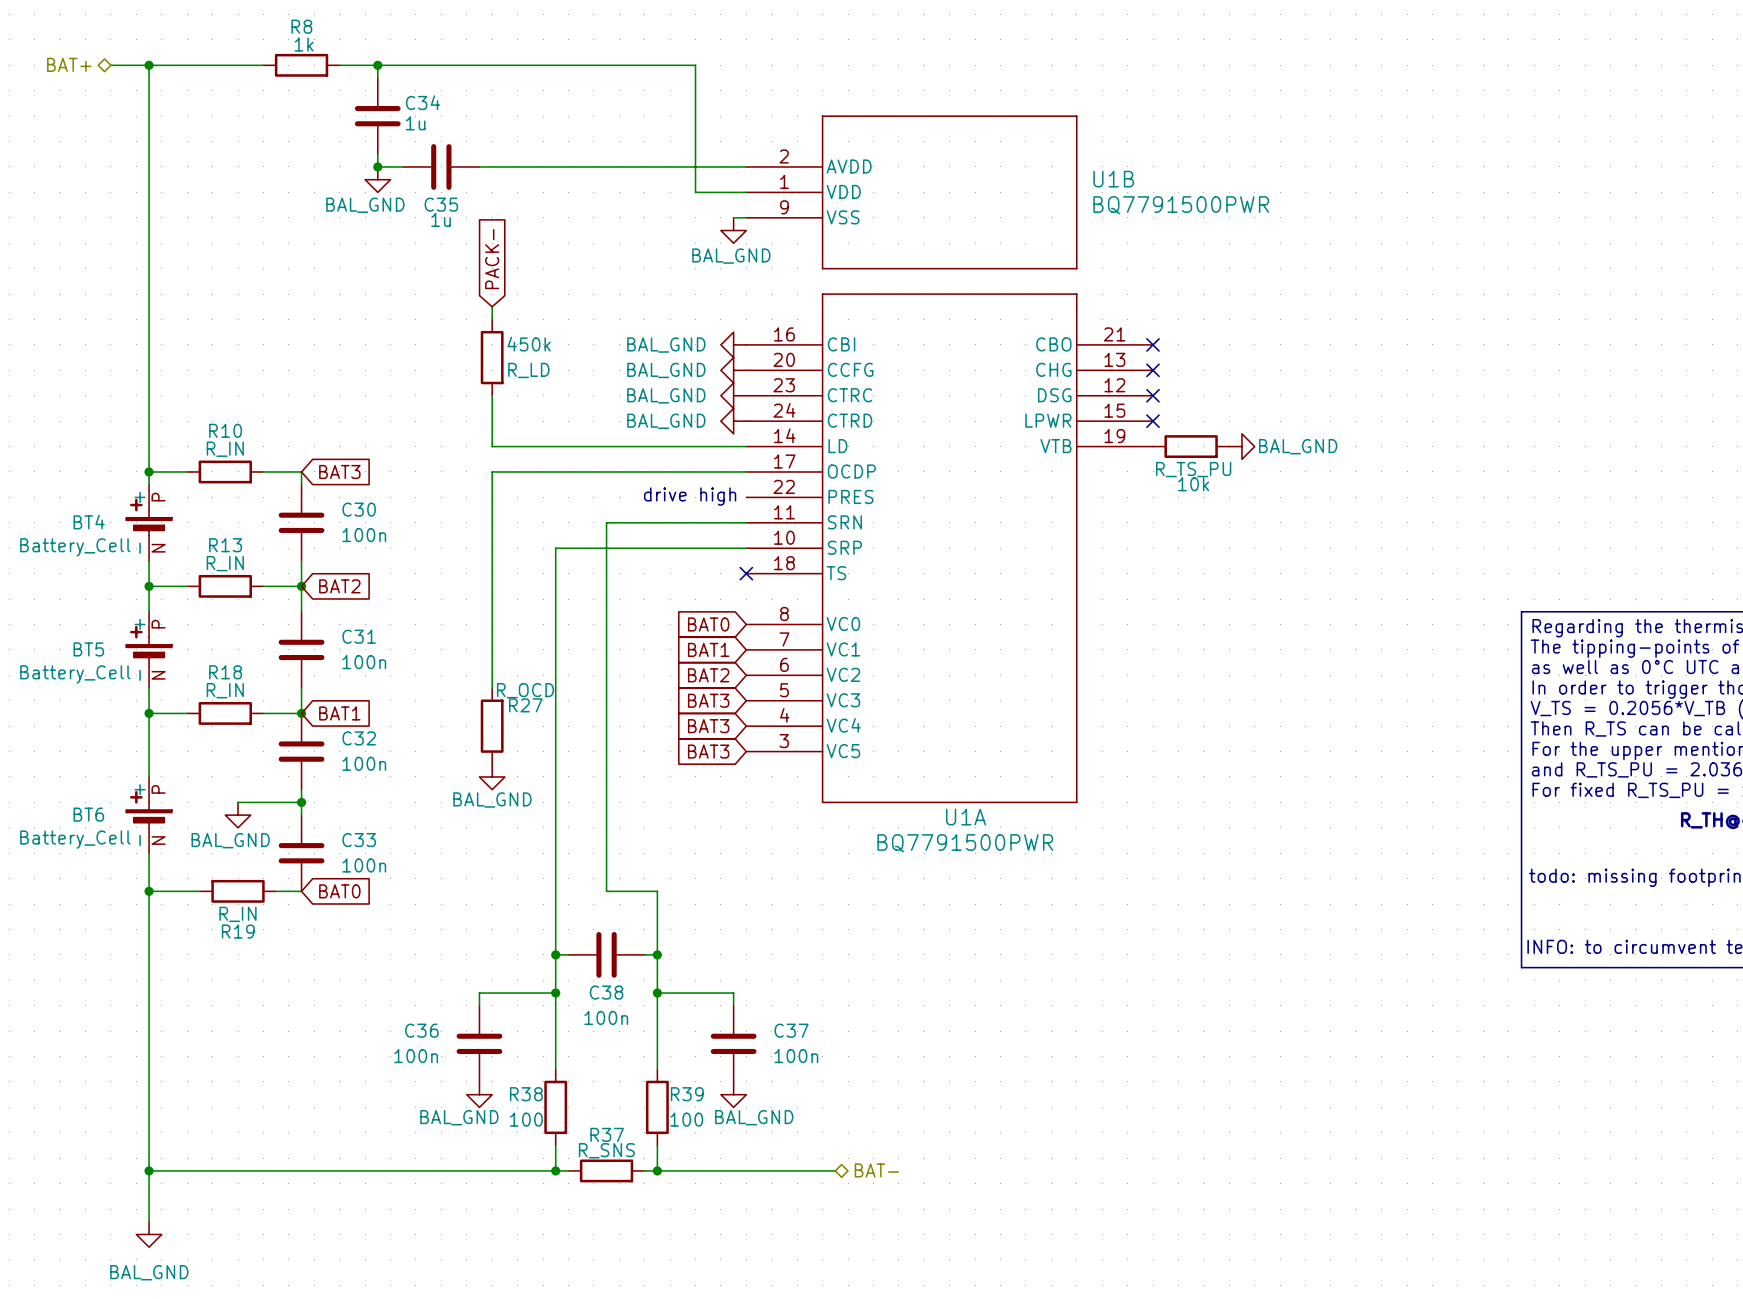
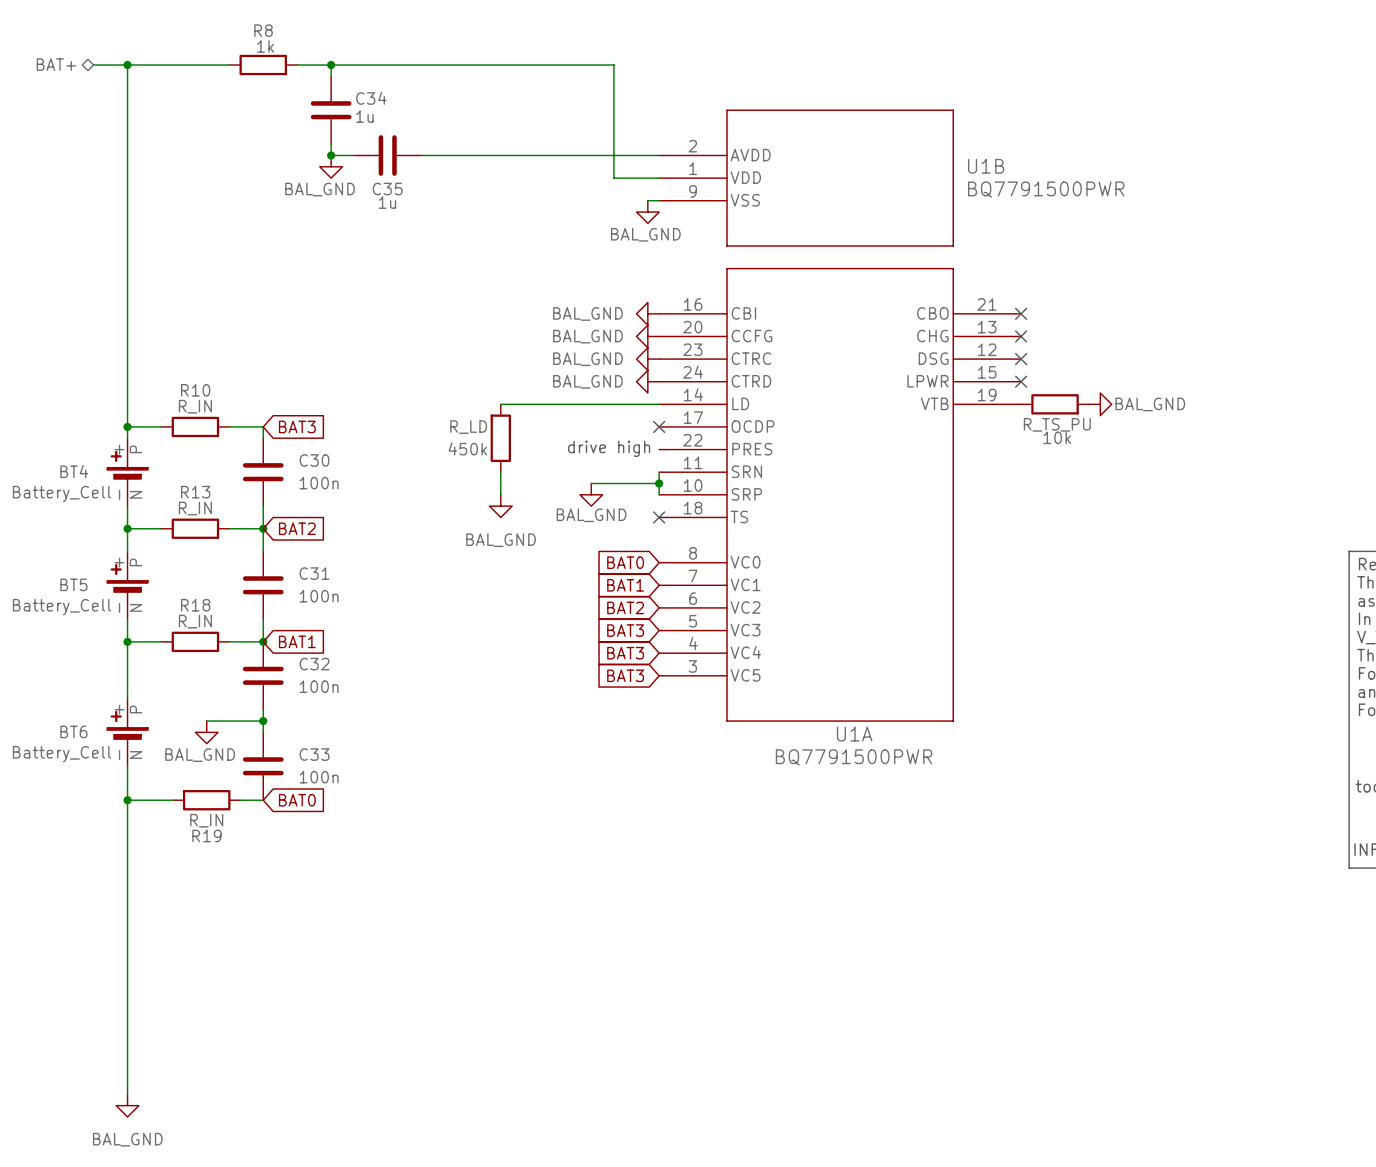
global label: PACK- (492, 259) -> none
wire: (492, 306) (492, 319) -> none
R_LD value position: 450k (529, 344) -> 450k (467, 448)
R_LD position: (492, 357) -> (500, 438)
R_LD name position: R_LD (528, 370) -> R_LD (468, 427)
wire: (492, 395) (492, 446) (568, 446) -> none
wire: (746, 471) (492, 471) (492, 688) -> none
no-connect mark: none -> (659, 426)
wire: none -> (500, 472) (500, 494)
wire: (746, 522) (606, 522) (606, 891) (657, 891) (657, 1069) -> (659, 472) (659, 494)
wire: none -> (591, 483) (659, 483)
junction: none -> (659, 483)
power symbol: none -> BAL_GND (591, 494)
wire: (746, 548) (555, 548) (555, 1069) -> none
power symbol: none -> BAL_GND (500, 506)
R27: R_OCD (492, 726) -> none
power symbol: BAL_GND (492, 776) -> none
wire: (555, 954) (568, 954) -> none
junction: (555, 954) -> none
C38: 100n (606, 954) -> none
wire: (644, 954) (657, 954) -> none
junction: (657, 954) -> none
wire: (555, 993) (479, 993) (479, 1005) -> none
junction: (555, 993) -> none
wire: (657, 993) (733, 993) (733, 1005) -> none
junction: (657, 993) -> none
C36: 100n (479, 1043) -> none
C37: 100n (733, 1043) -> none
power symbol: BAL_GND (479, 1094) -> none
power symbol: BAL_GND (733, 1094) -> none
R38: 100 (555, 1107) -> none
R39: 100 (657, 1107) -> none
wire: (555, 1145) (555, 1170) -> none
wire: (657, 1145) (657, 1170) -> none
wire: (149, 1170) (568, 1170) -> none
junction: (149, 1170) -> none
junction: (555, 1170) -> none
R37: R_SNS (606, 1170) -> none
wire: (644, 1170) (835, 1170) -> none
junction: (657, 1170) -> none
hierarchical label: BAT- (876, 1170) -> none

